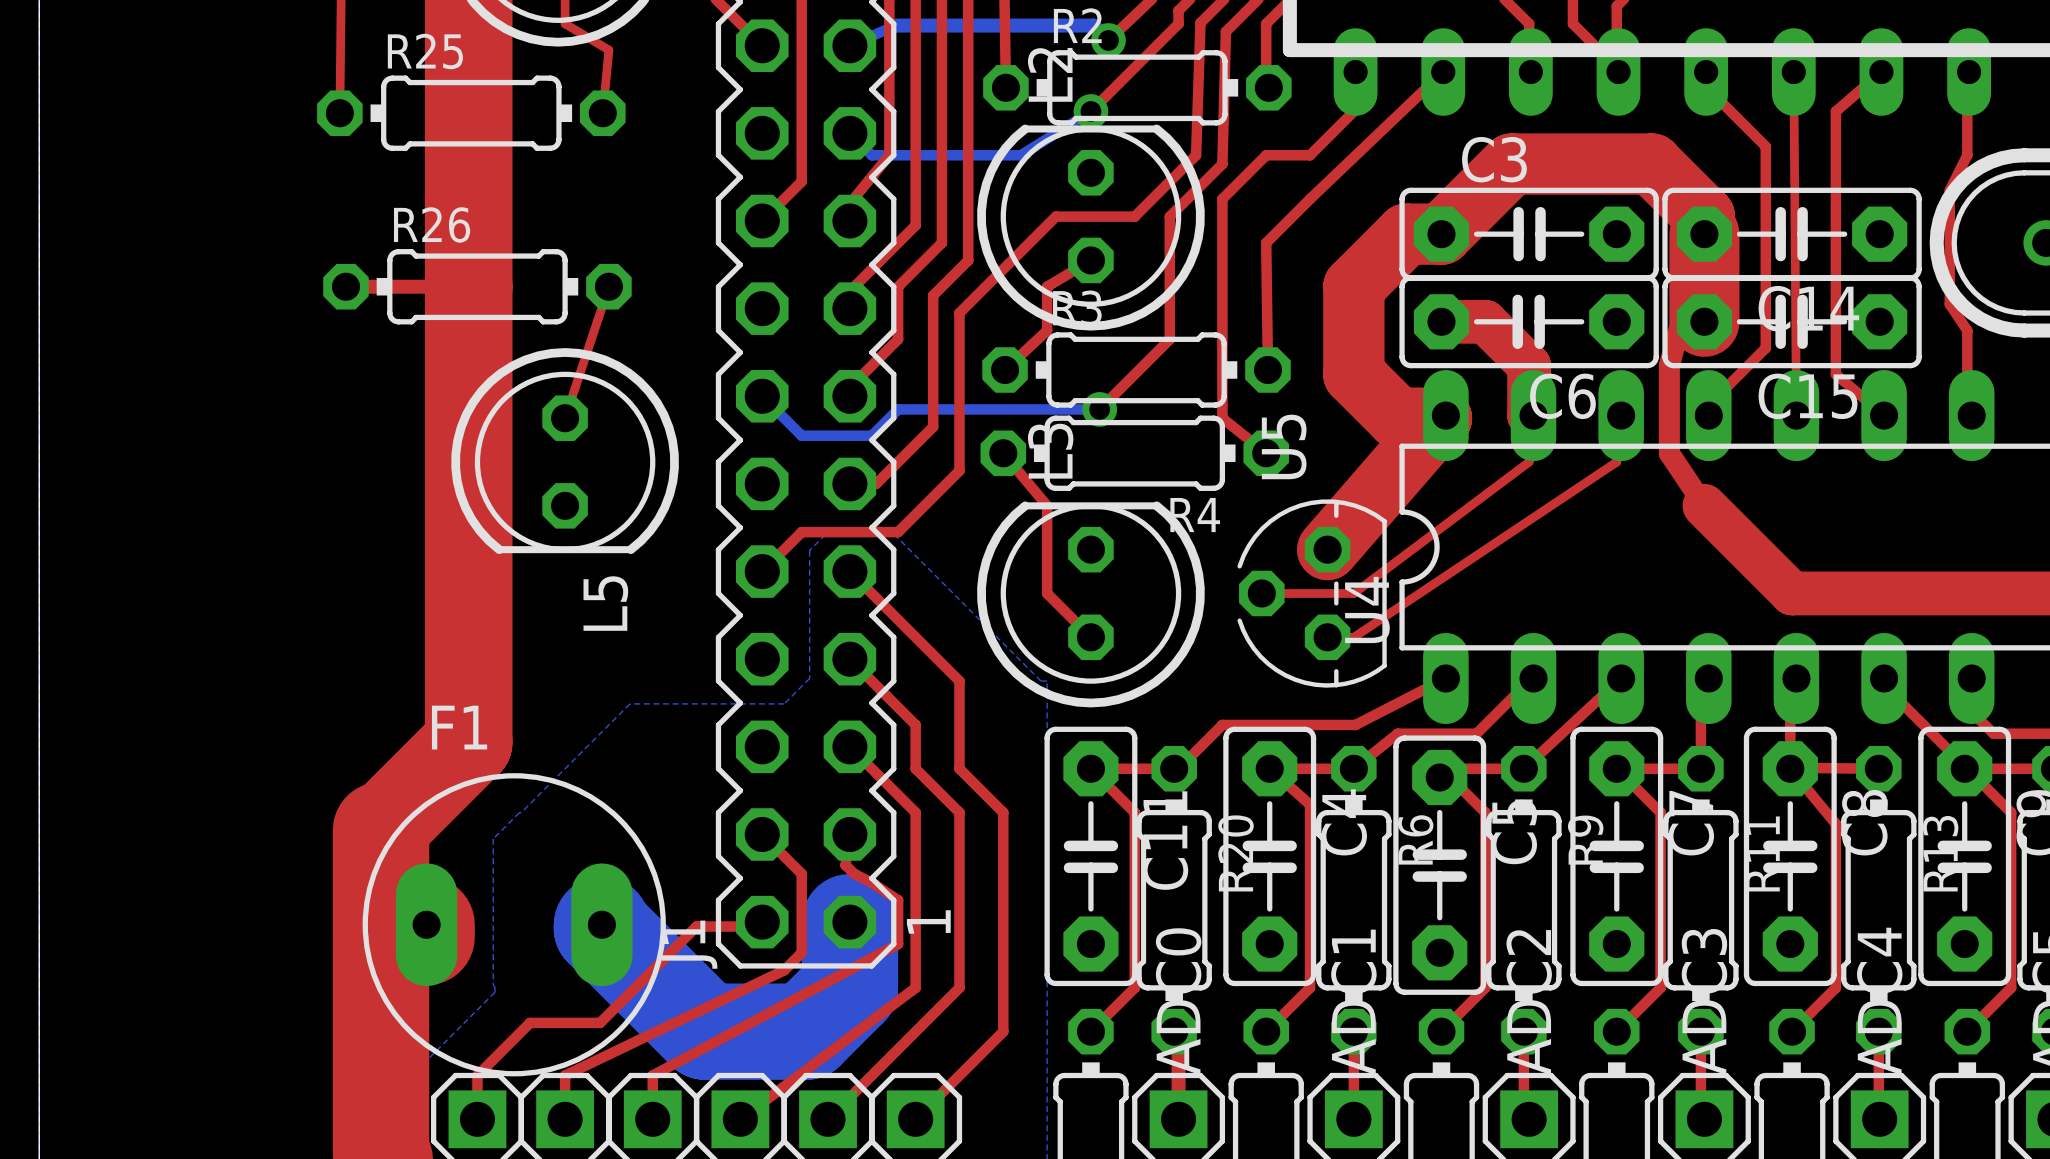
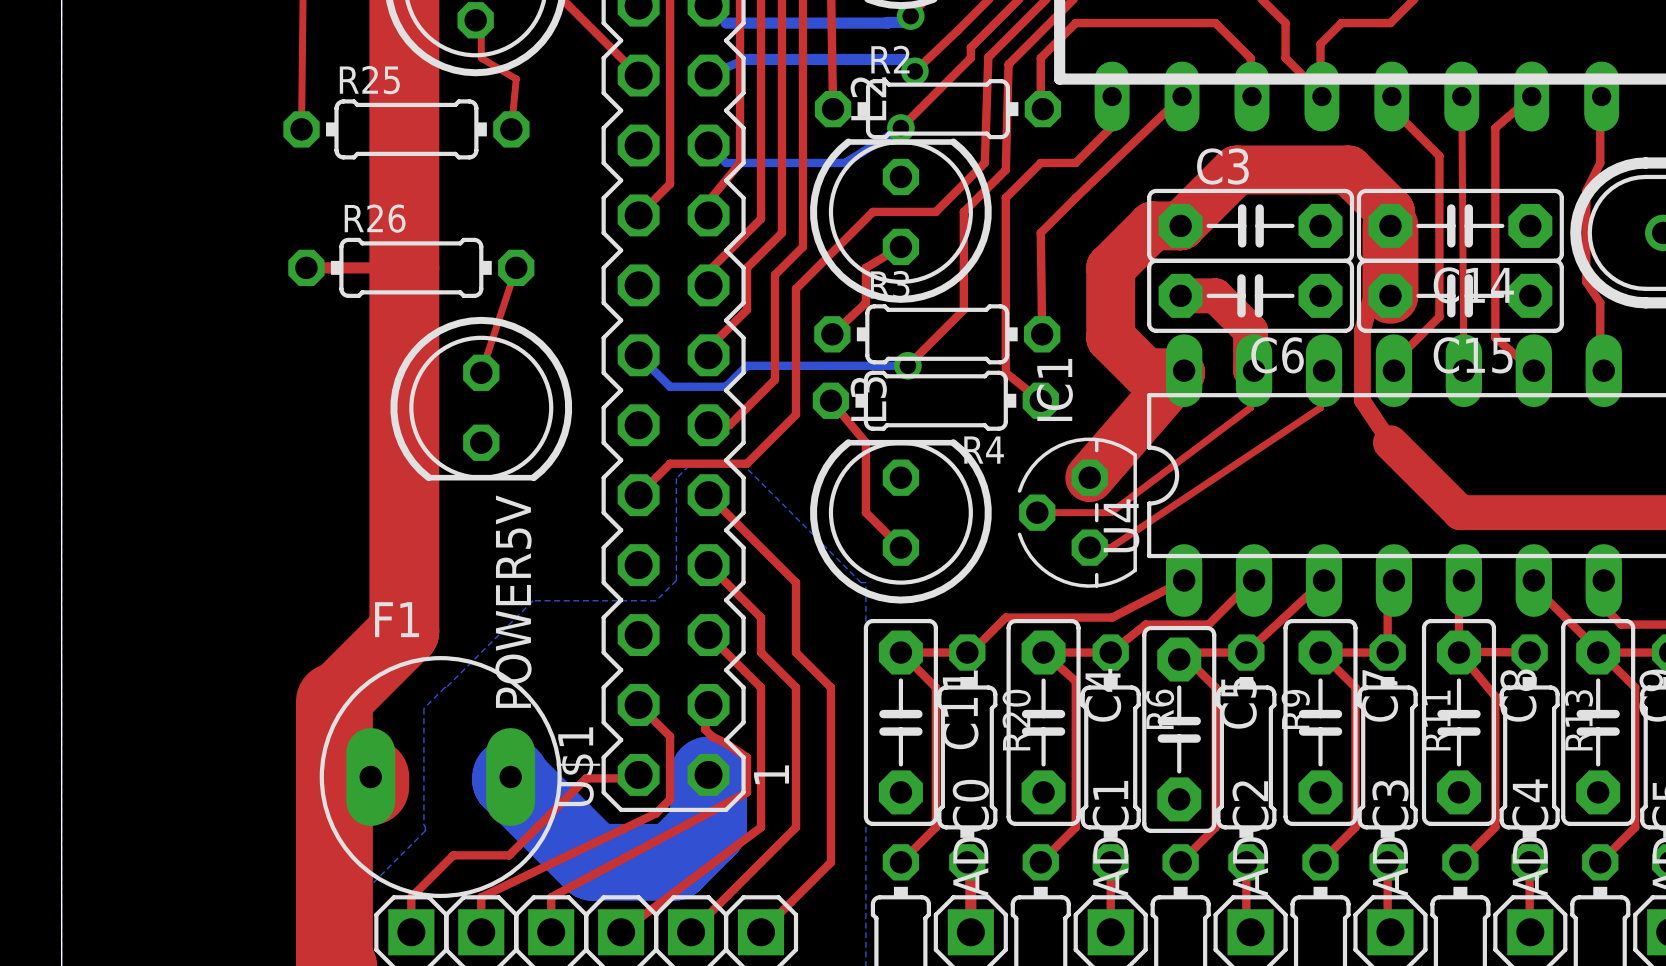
U5 name: U5 (1284, 446) -> IC1 (1054, 389)
L5 name: L5 (605, 603) -> POWER5V (513, 601)
J1 name: J1 (689, 944) -> U$1 (578, 766)

